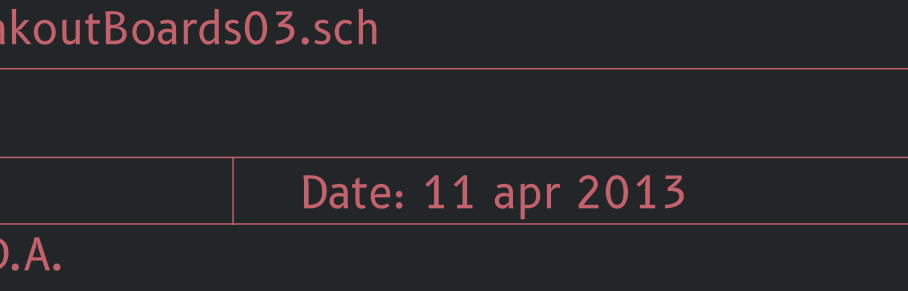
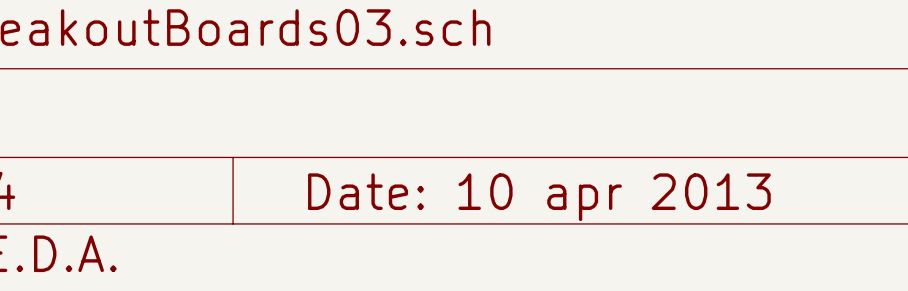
title block: Date: 11 apr 2013 (493, 197) -> Date: 10 apr 2013 (539, 197)

